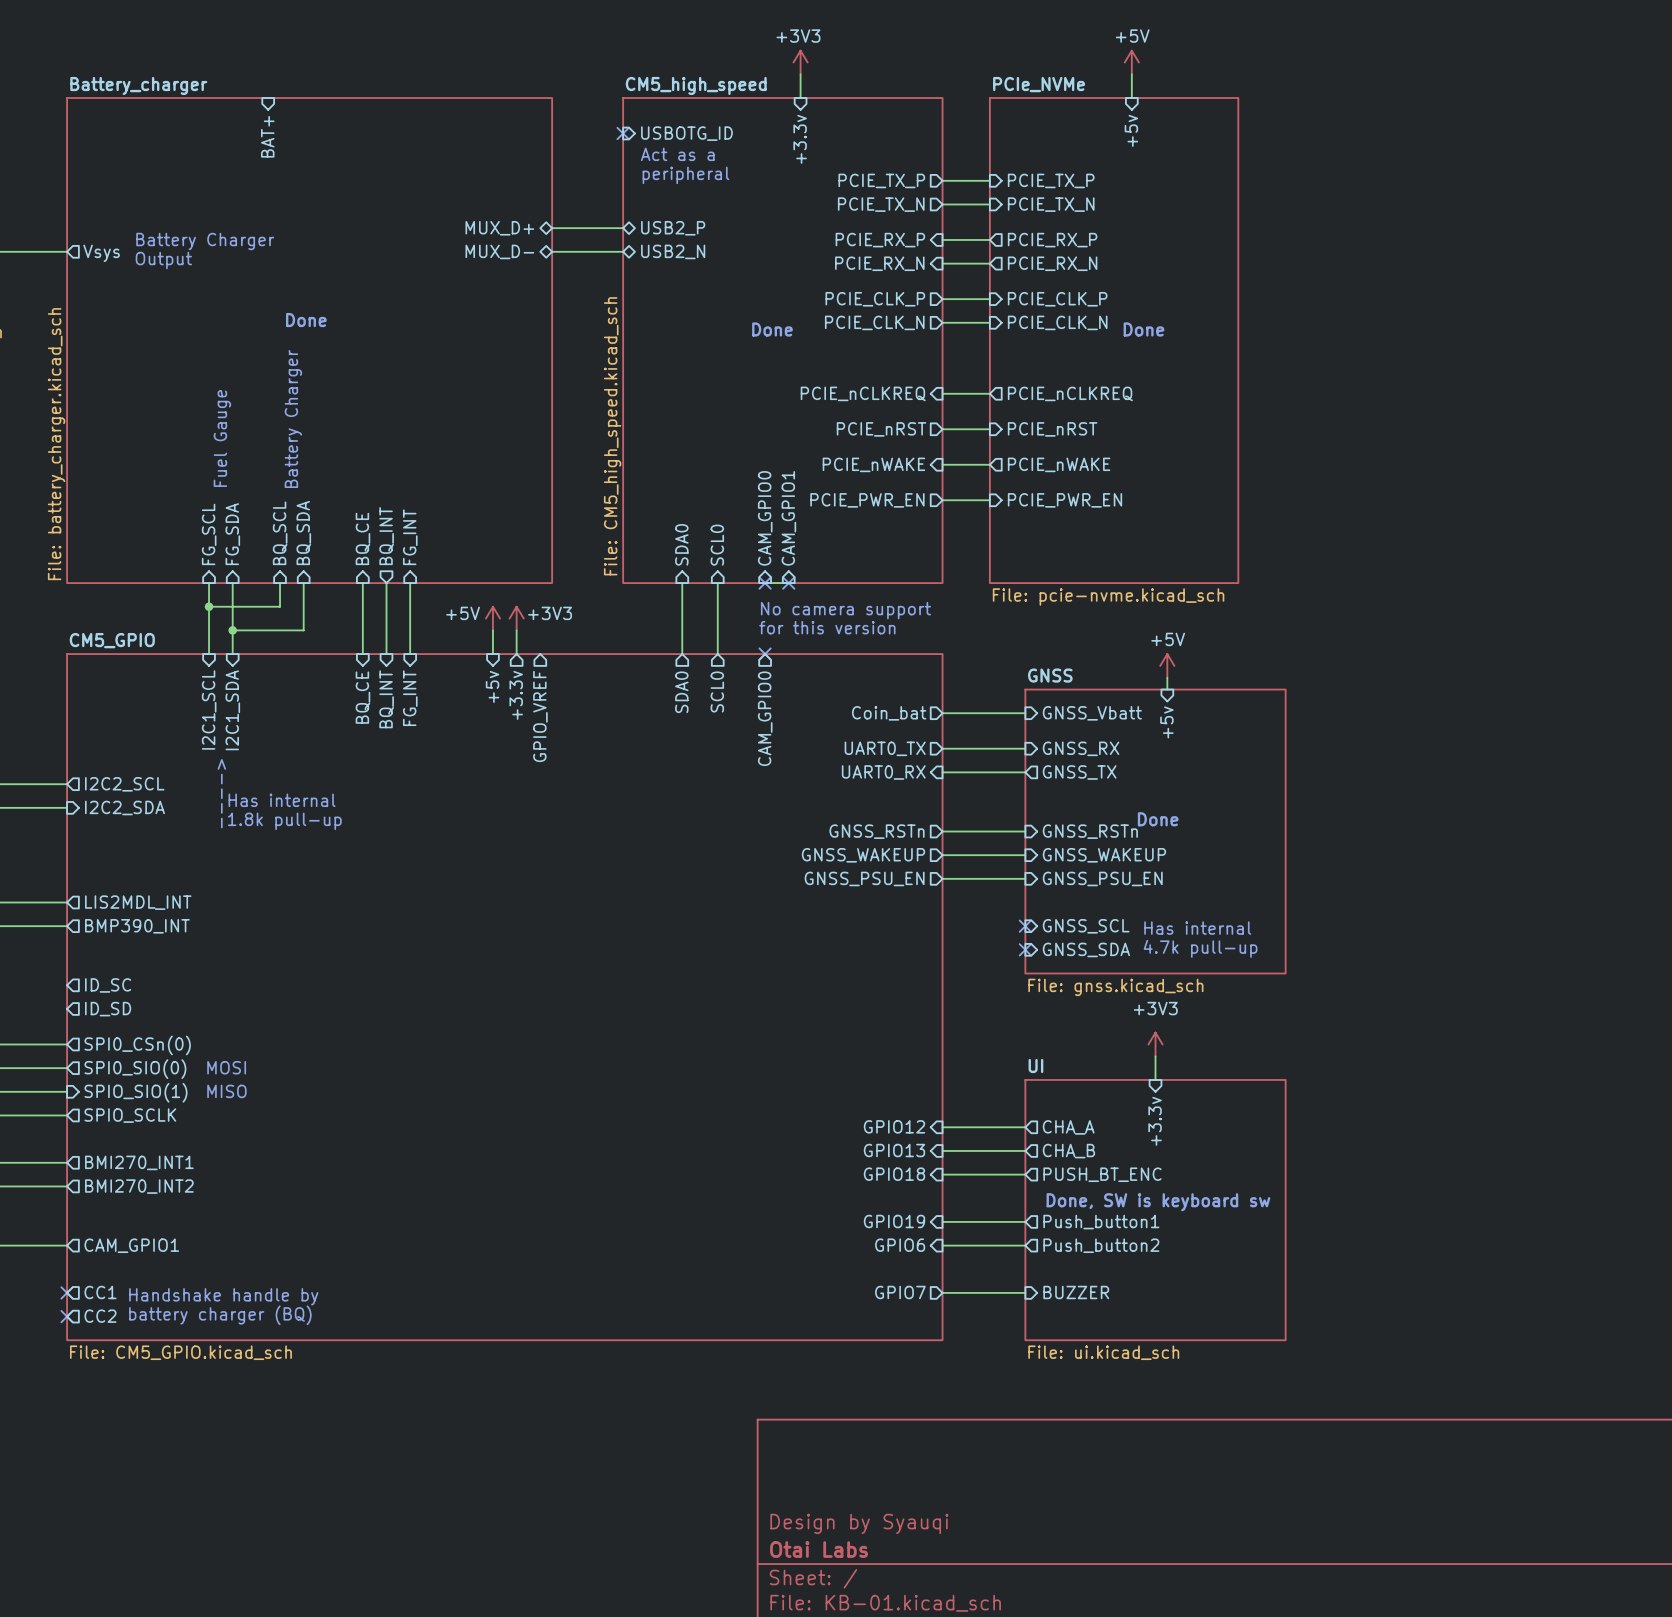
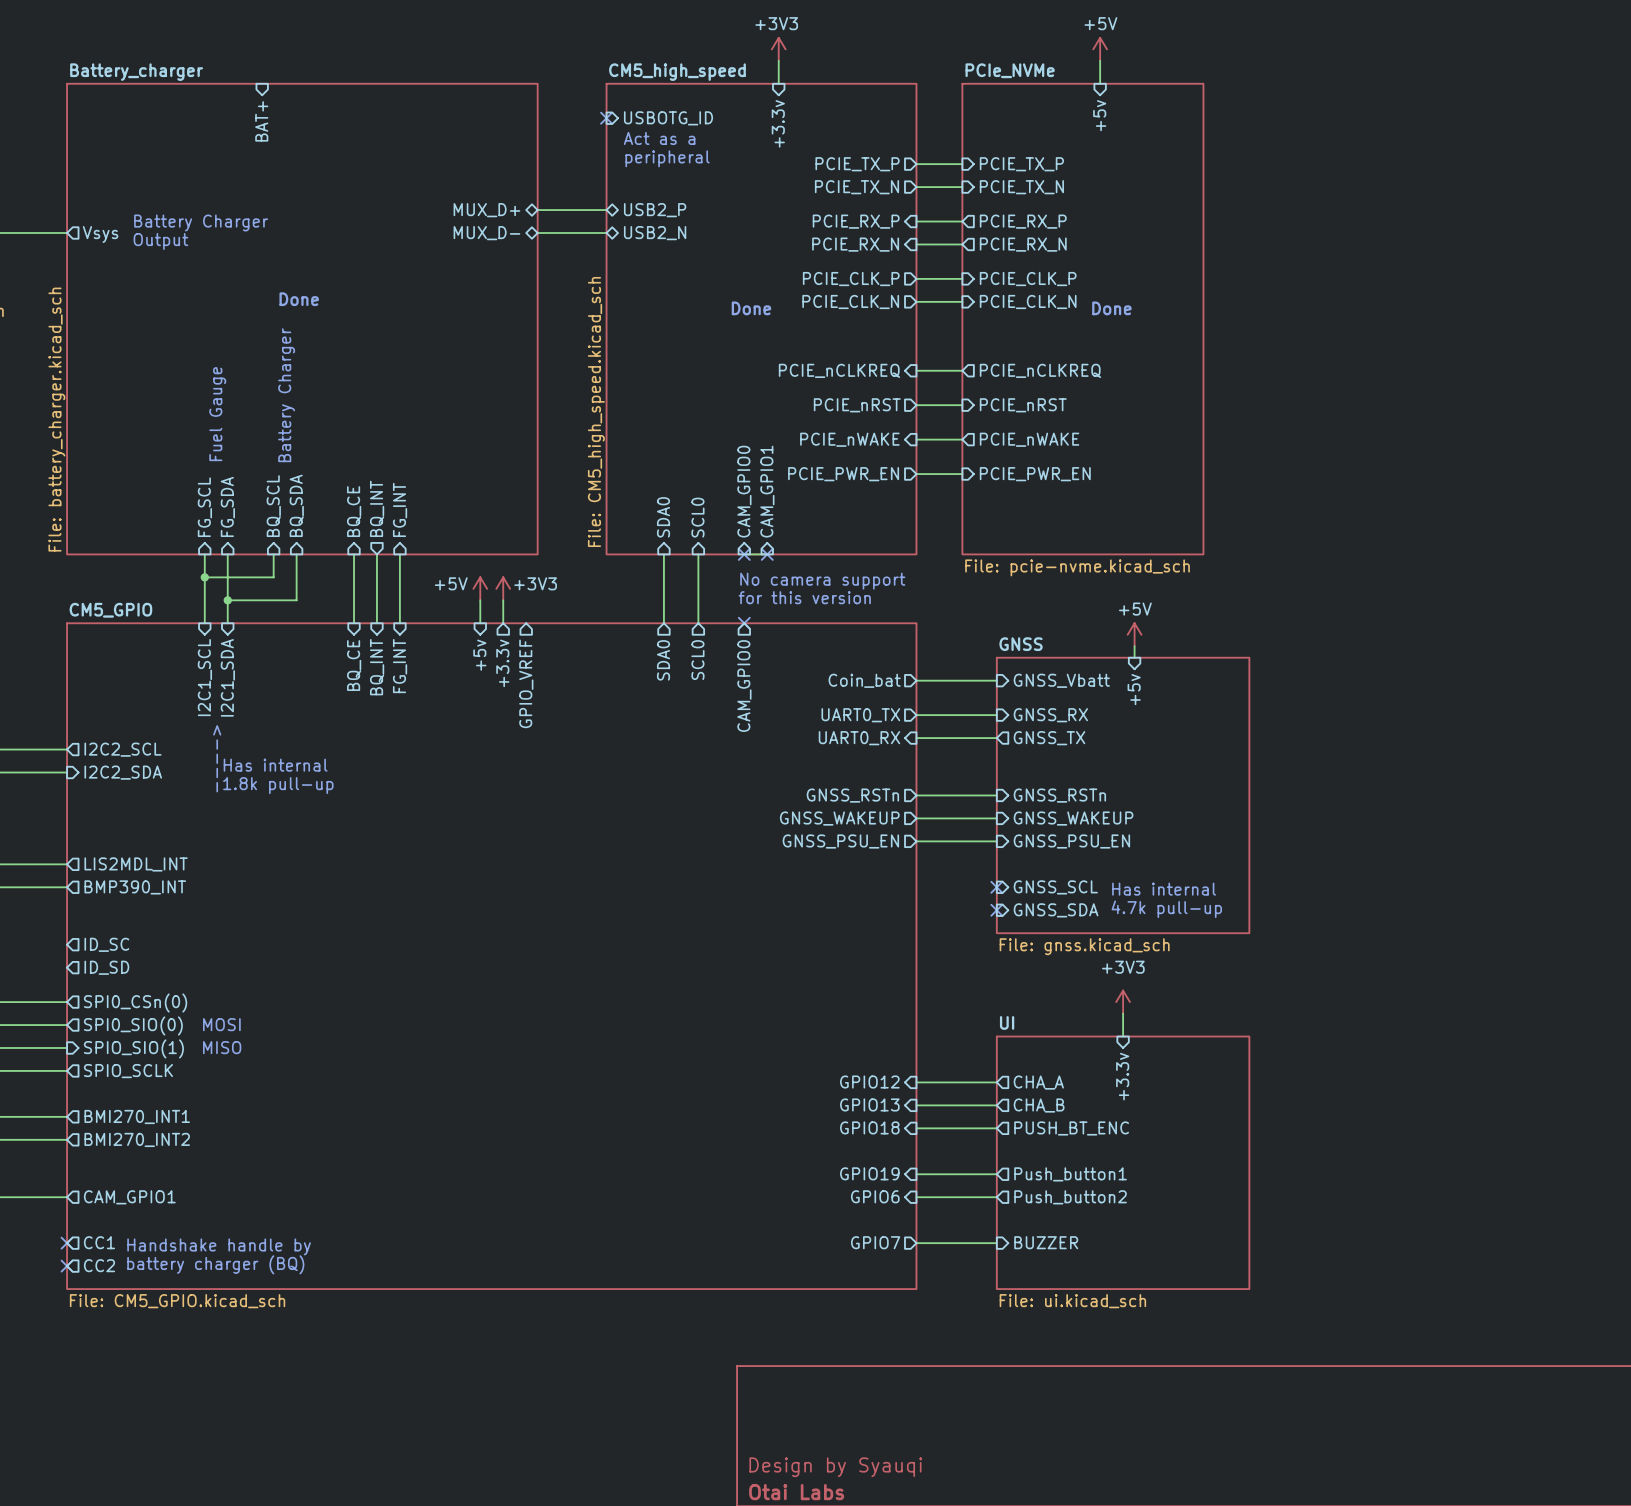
text: Done (1158, 819) -> none
text: Done, SW is keyboard sw (1158, 1202) -> none

